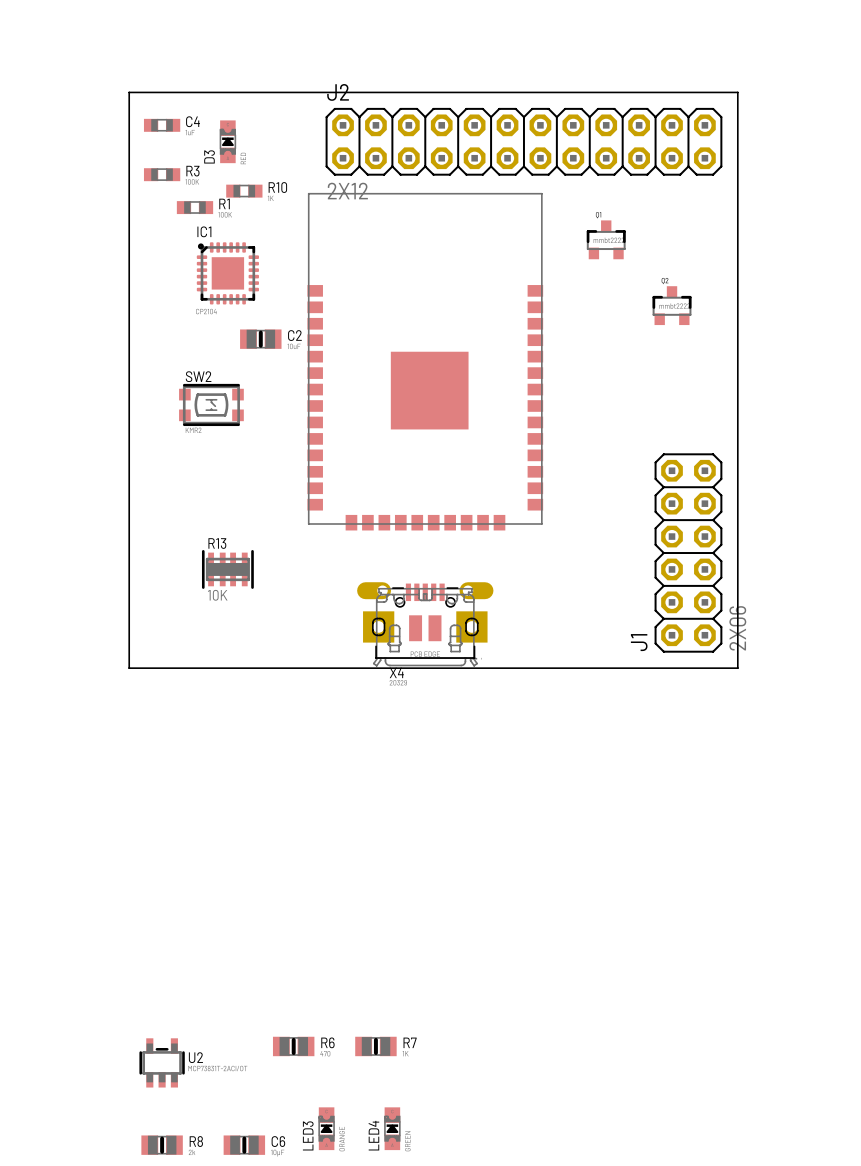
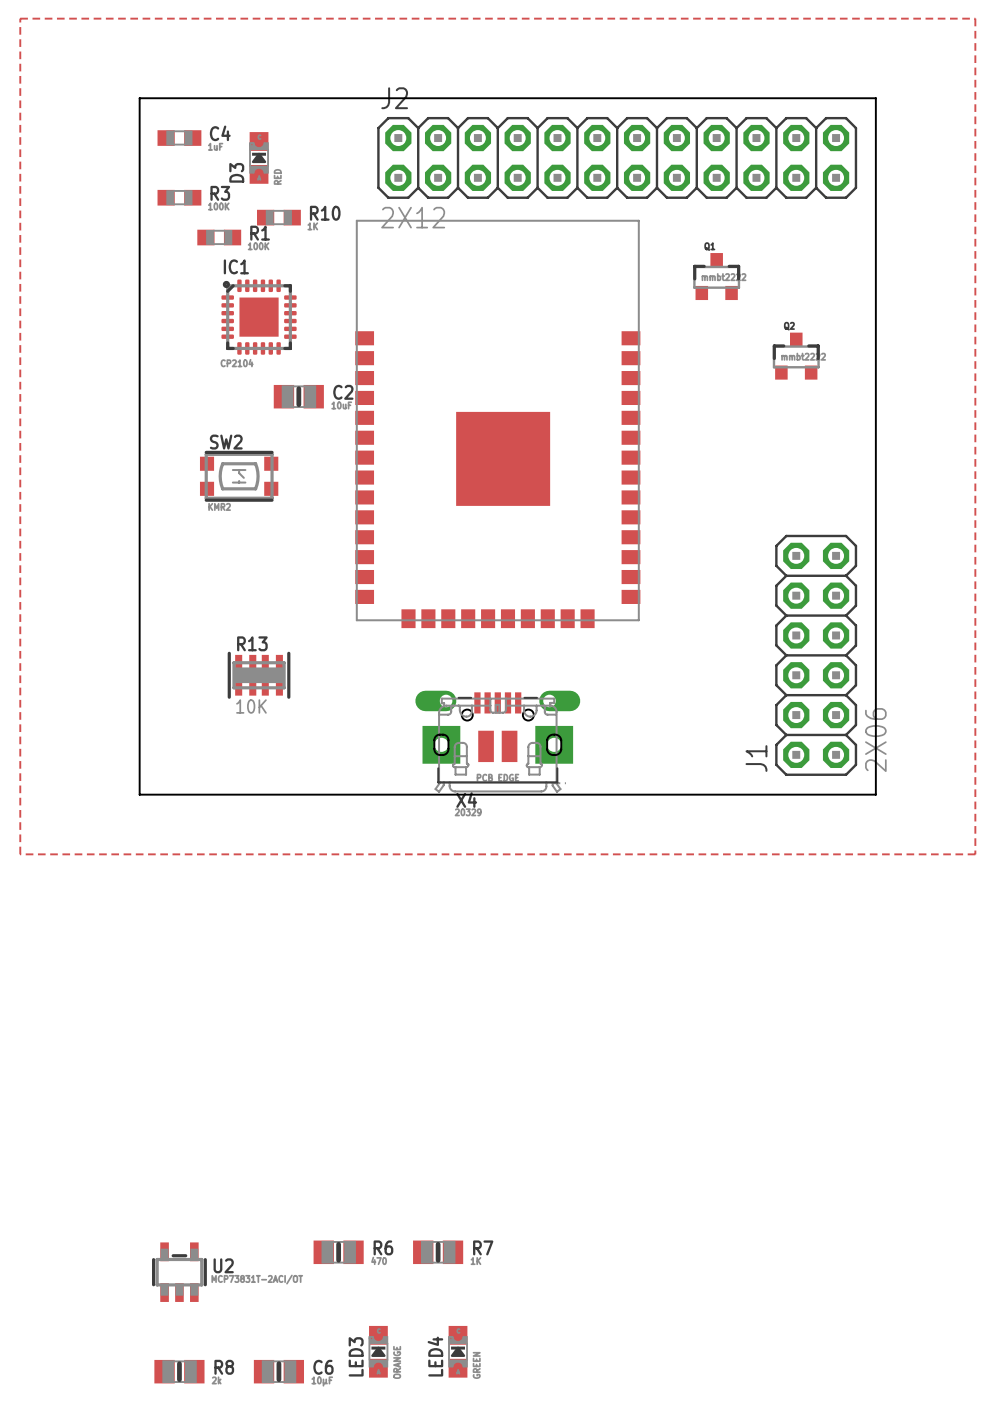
zone outline: none -> (20, 18) (975, 18) (975, 854) (20, 854) (20, 18)

